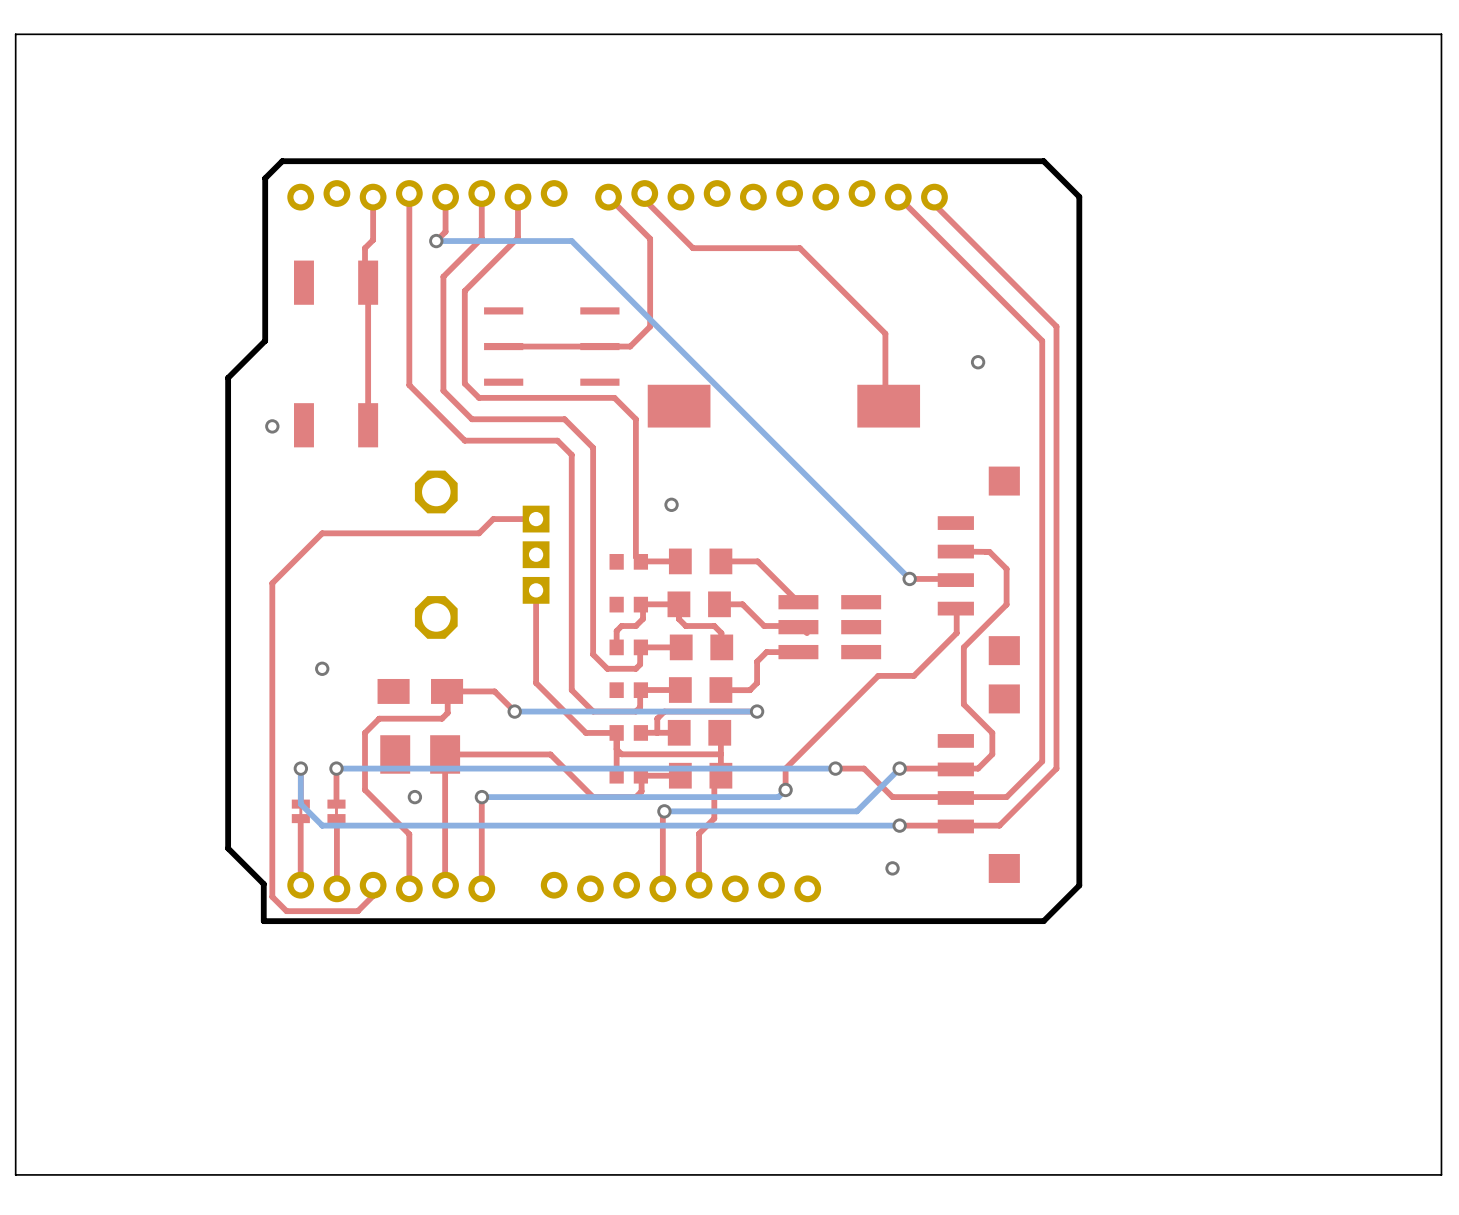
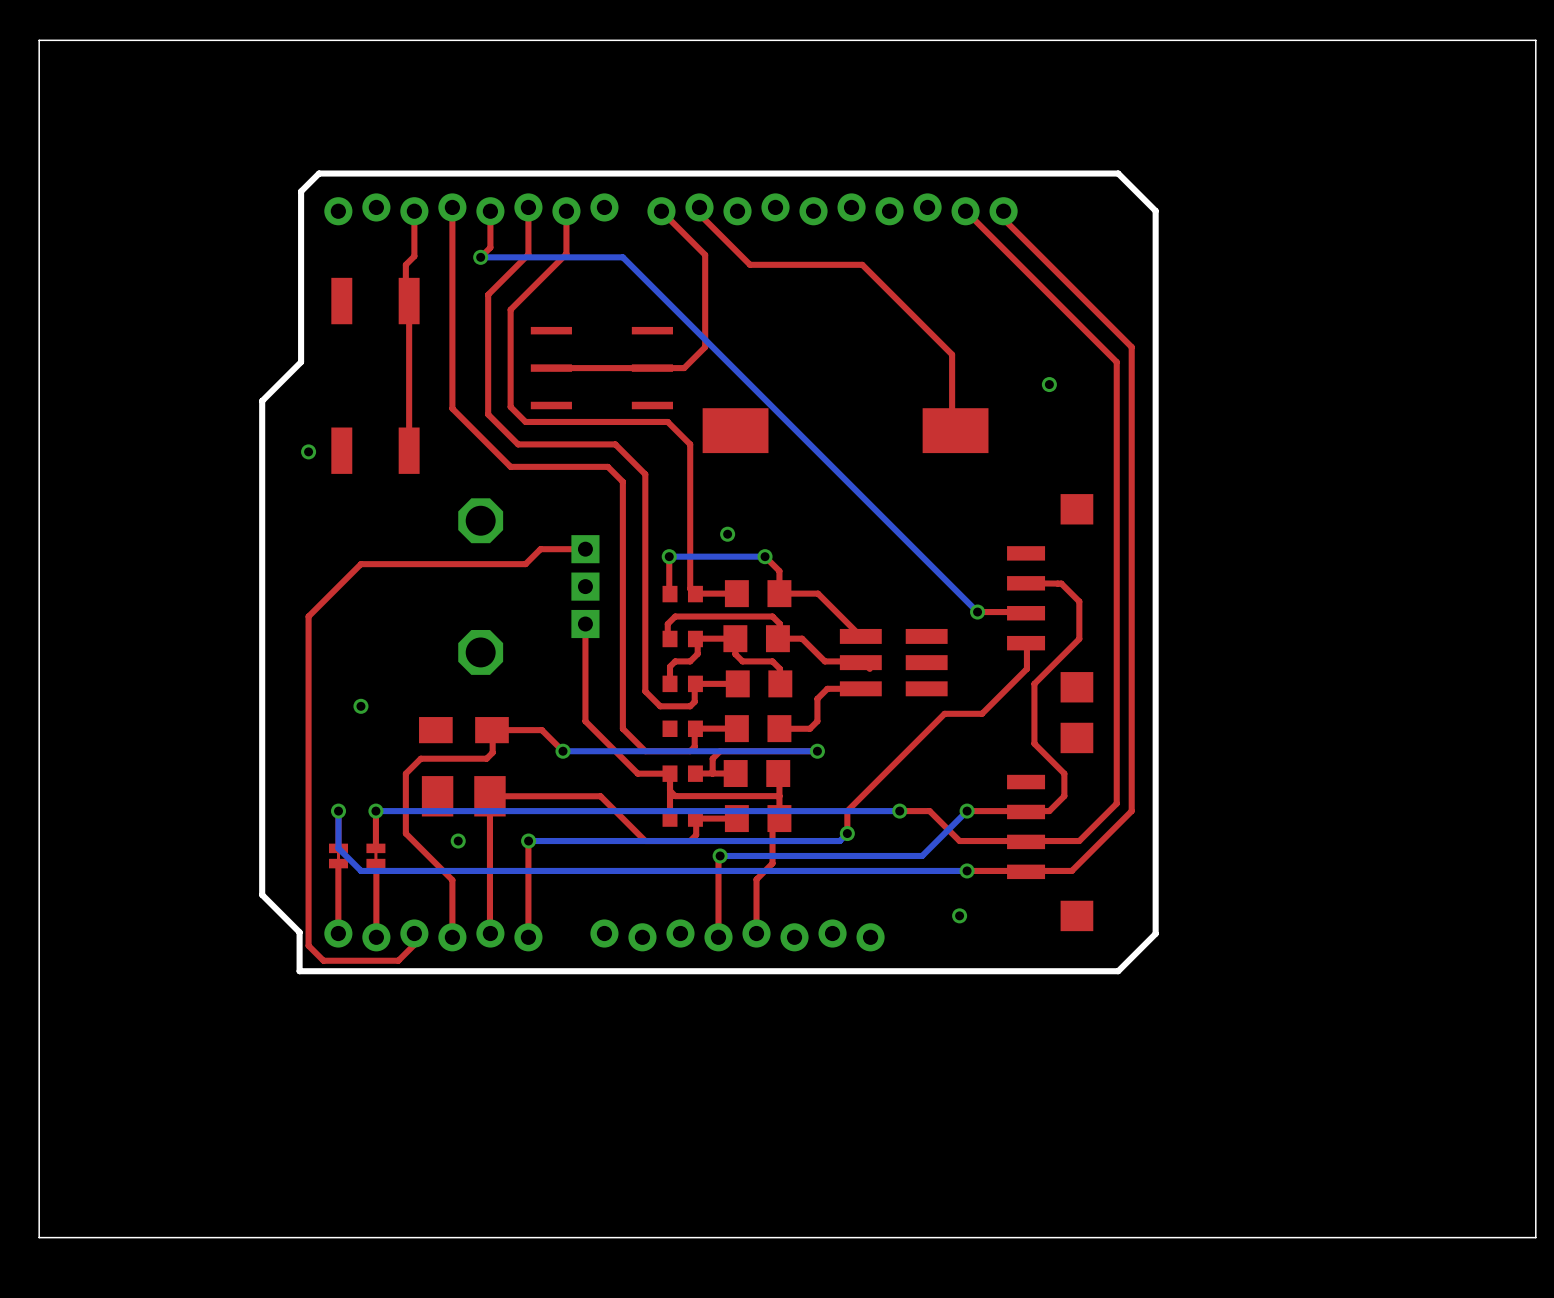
top track: none -> (669, 556) (670, 594)
via: none -> (669, 556)
top track: none -> (765, 556) (779, 571) (779, 593)
bottom track: none -> (765, 556) (669, 556)
via: none -> (765, 556)
top track: none -> (777, 638) (780, 636) (780, 624) (772, 616) (675, 616) (667, 624) (667, 638) (670, 638)

